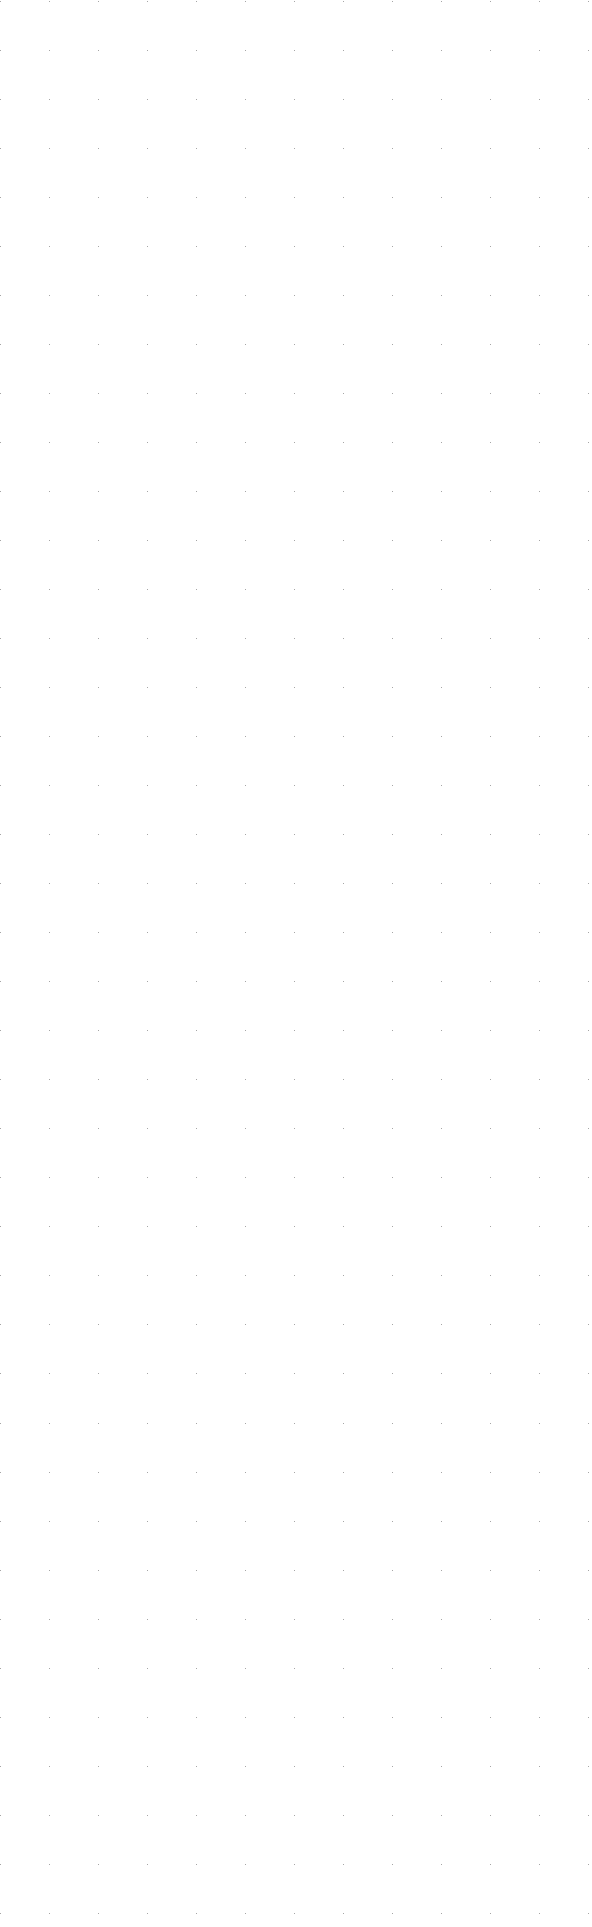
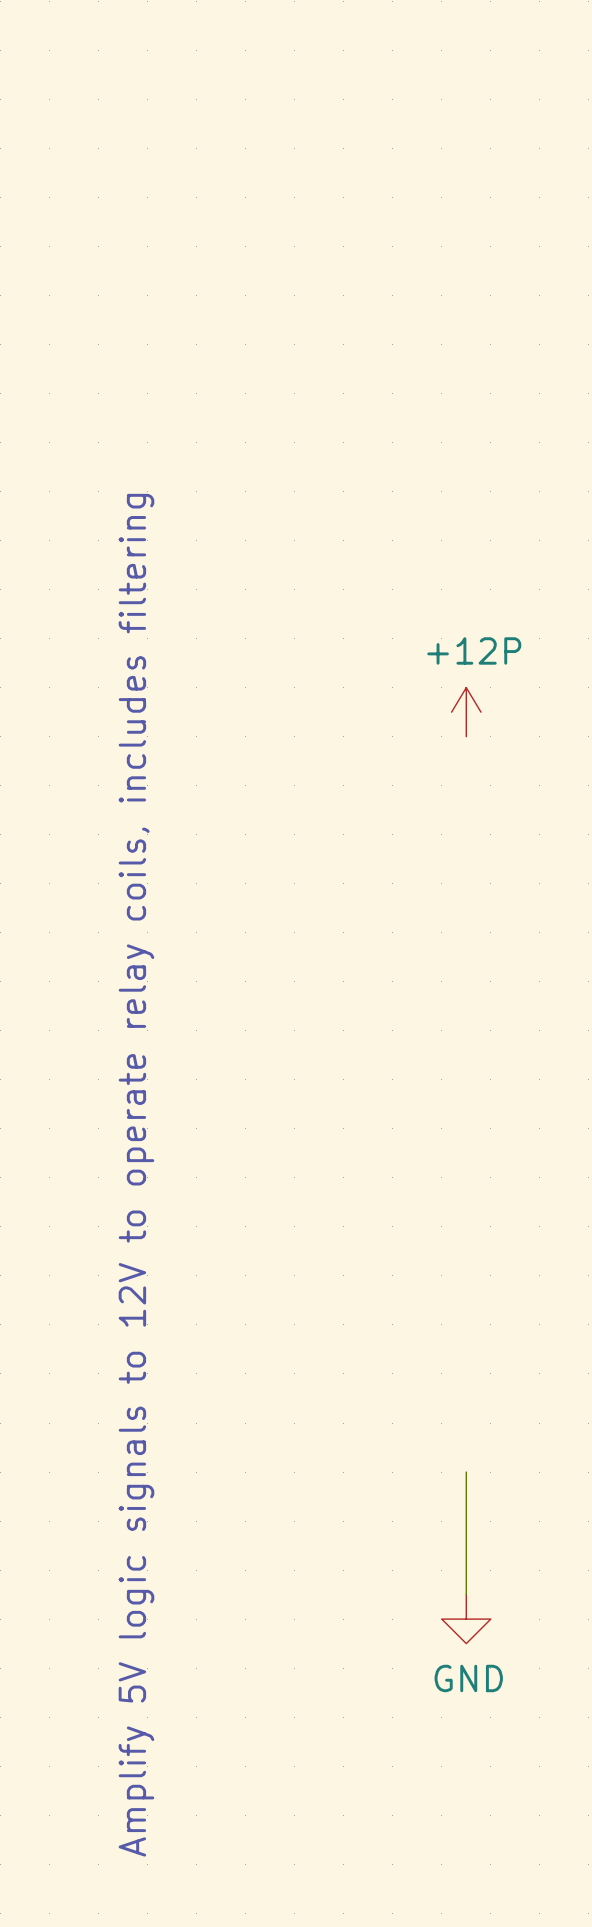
power symbol: none -> +12P (466, 712)
text: none -> Amplify 5V logic signals to 12V to operate relay coils, includes filtering (136, 1175)
wire: none -> (466, 1472) (466, 1594)
power symbol: none -> GND (466, 1619)

